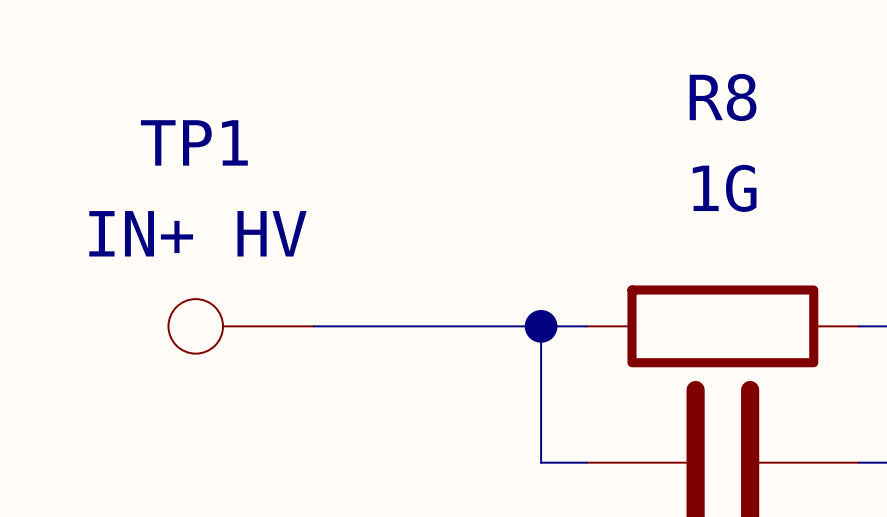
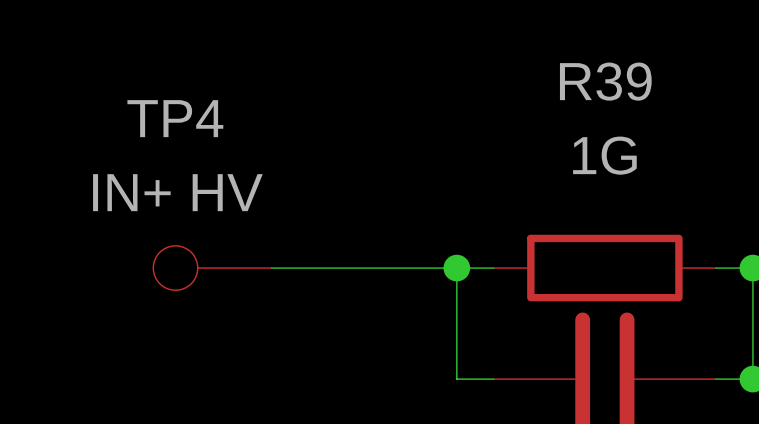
R8 name: R8 (723, 97) -> R39 (605, 81)
TP1 name: TP1 (194, 142) -> TP4 (175, 118)

